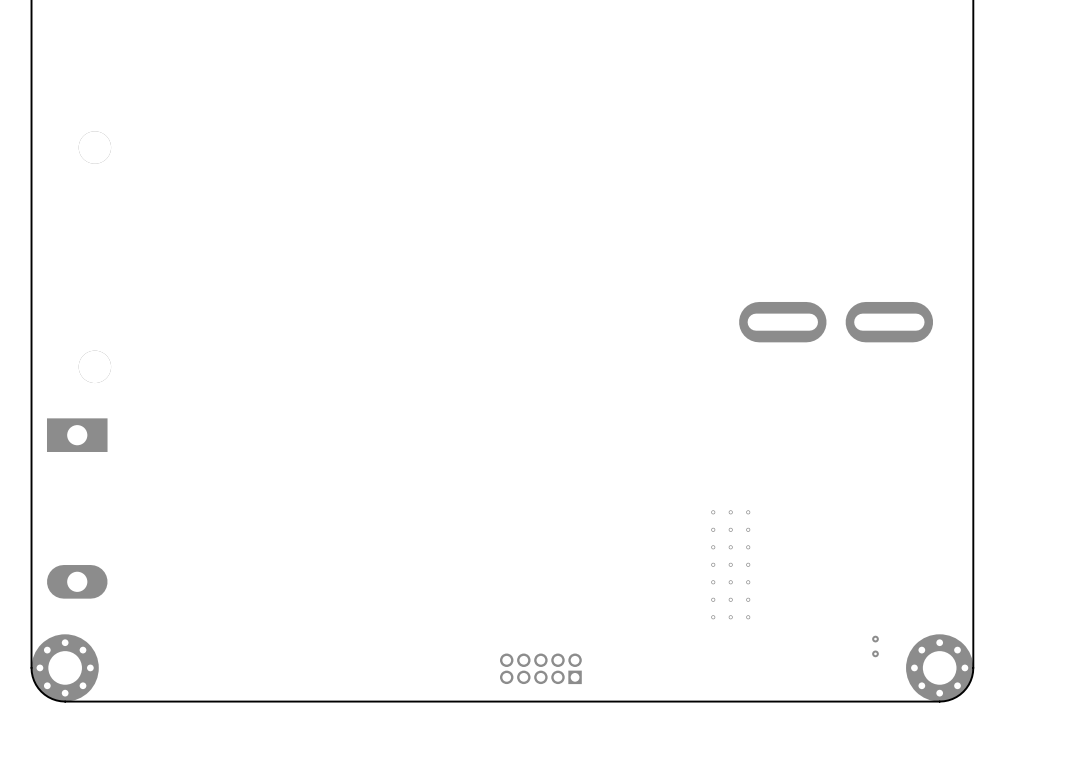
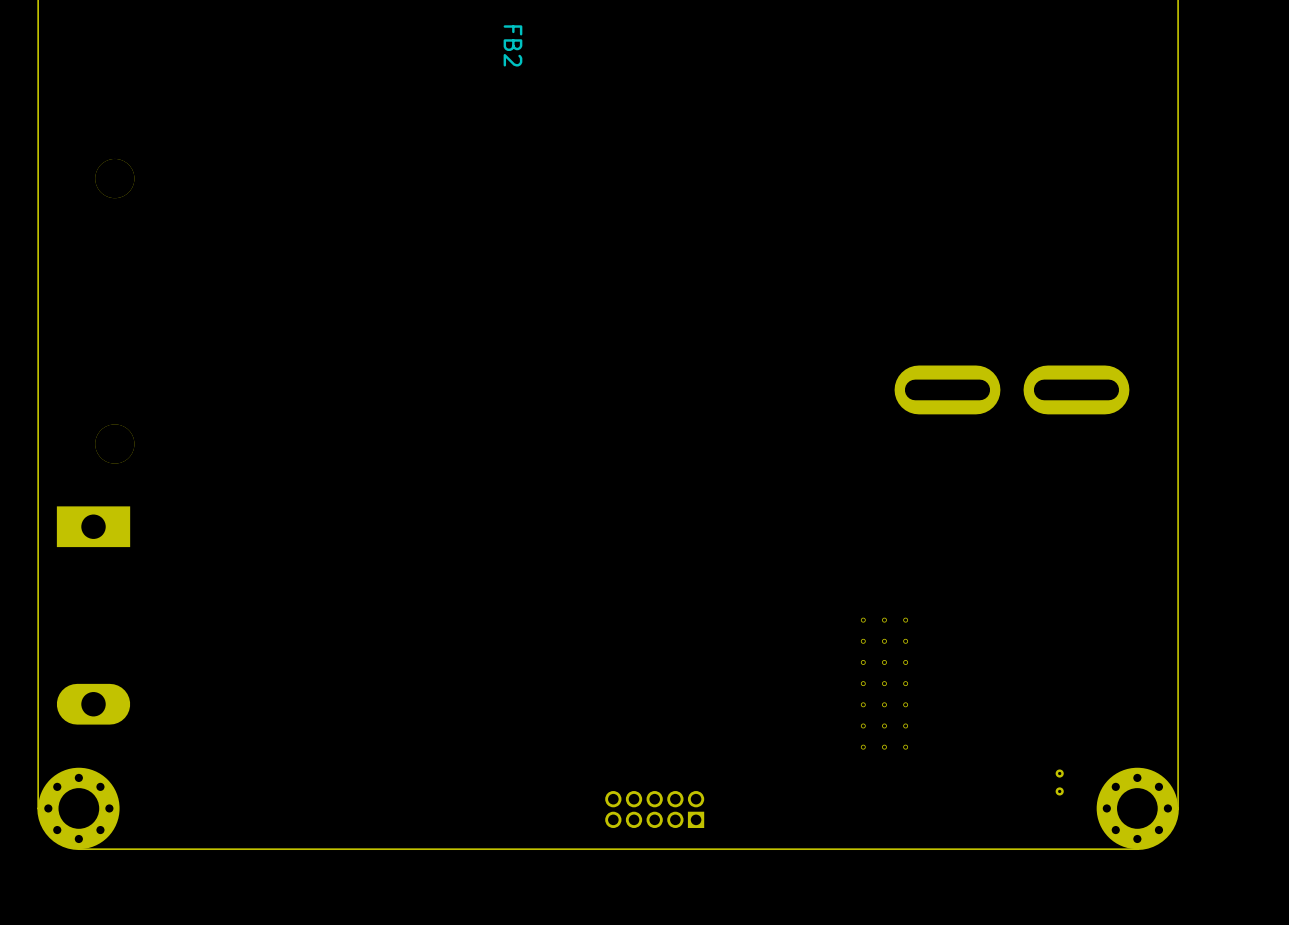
FB2: none -> (512, 45)

